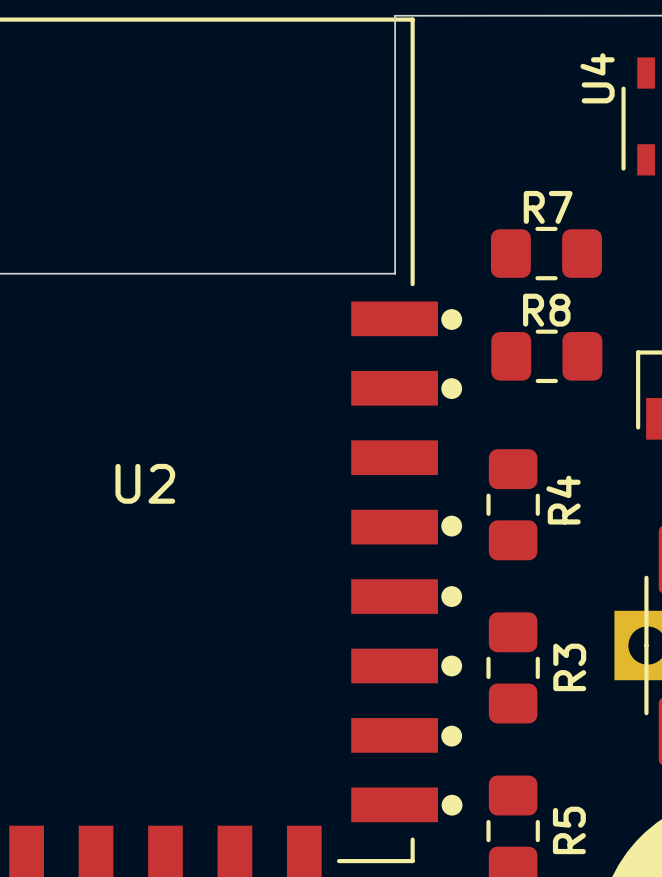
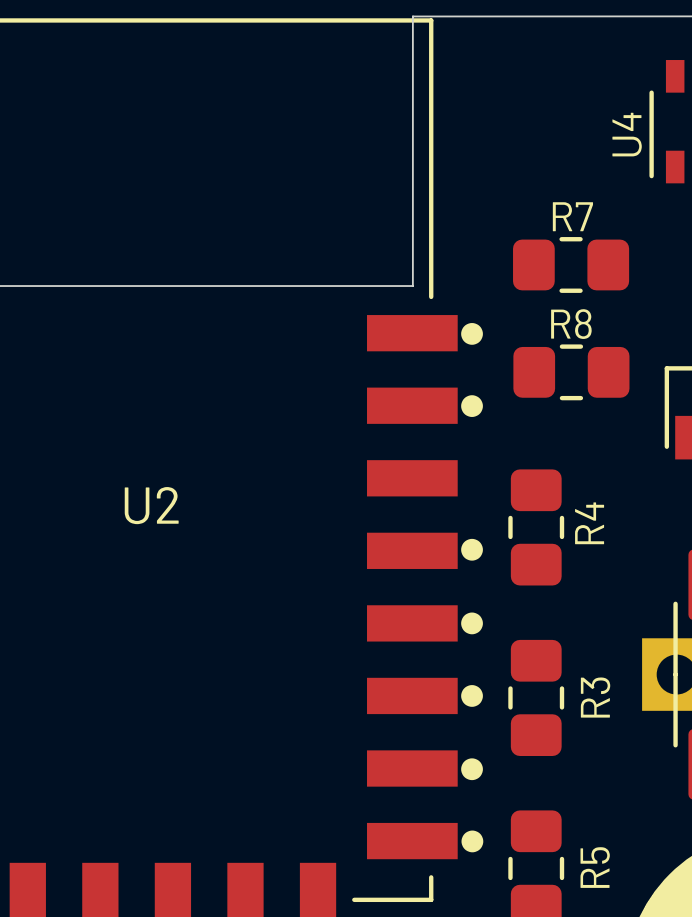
U4 name position: U4 (597, 78) -> U4 (627, 134)

